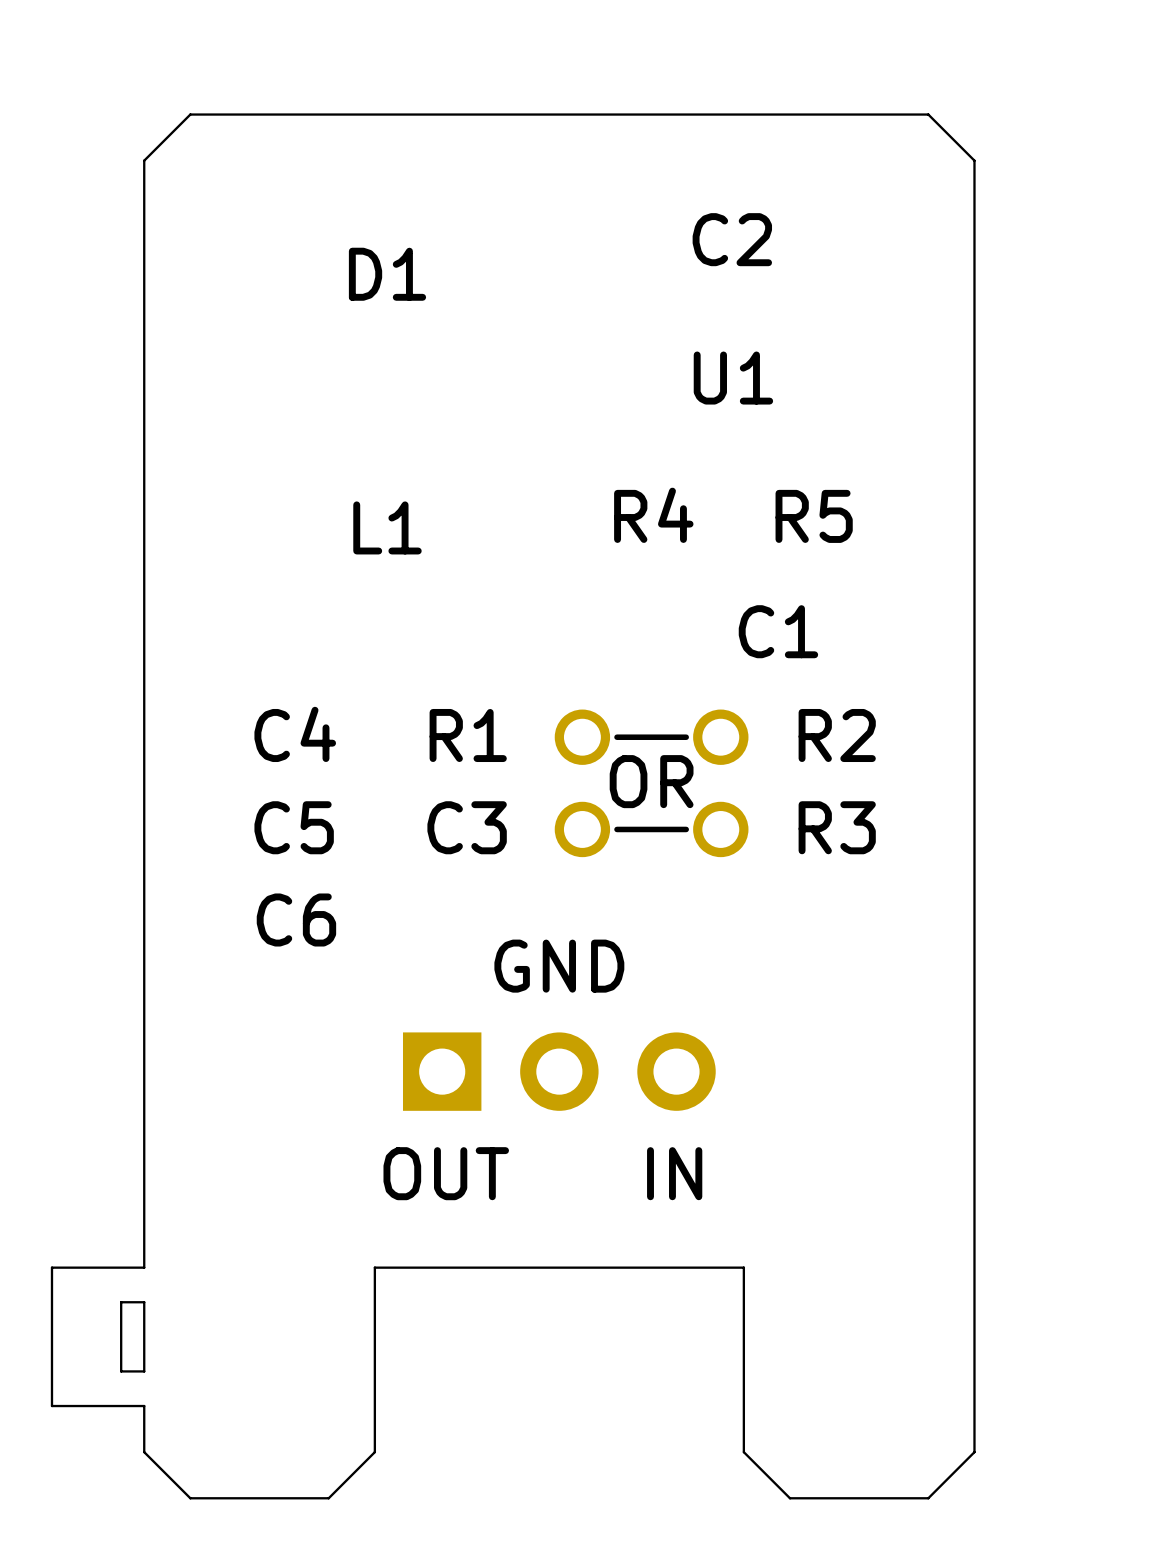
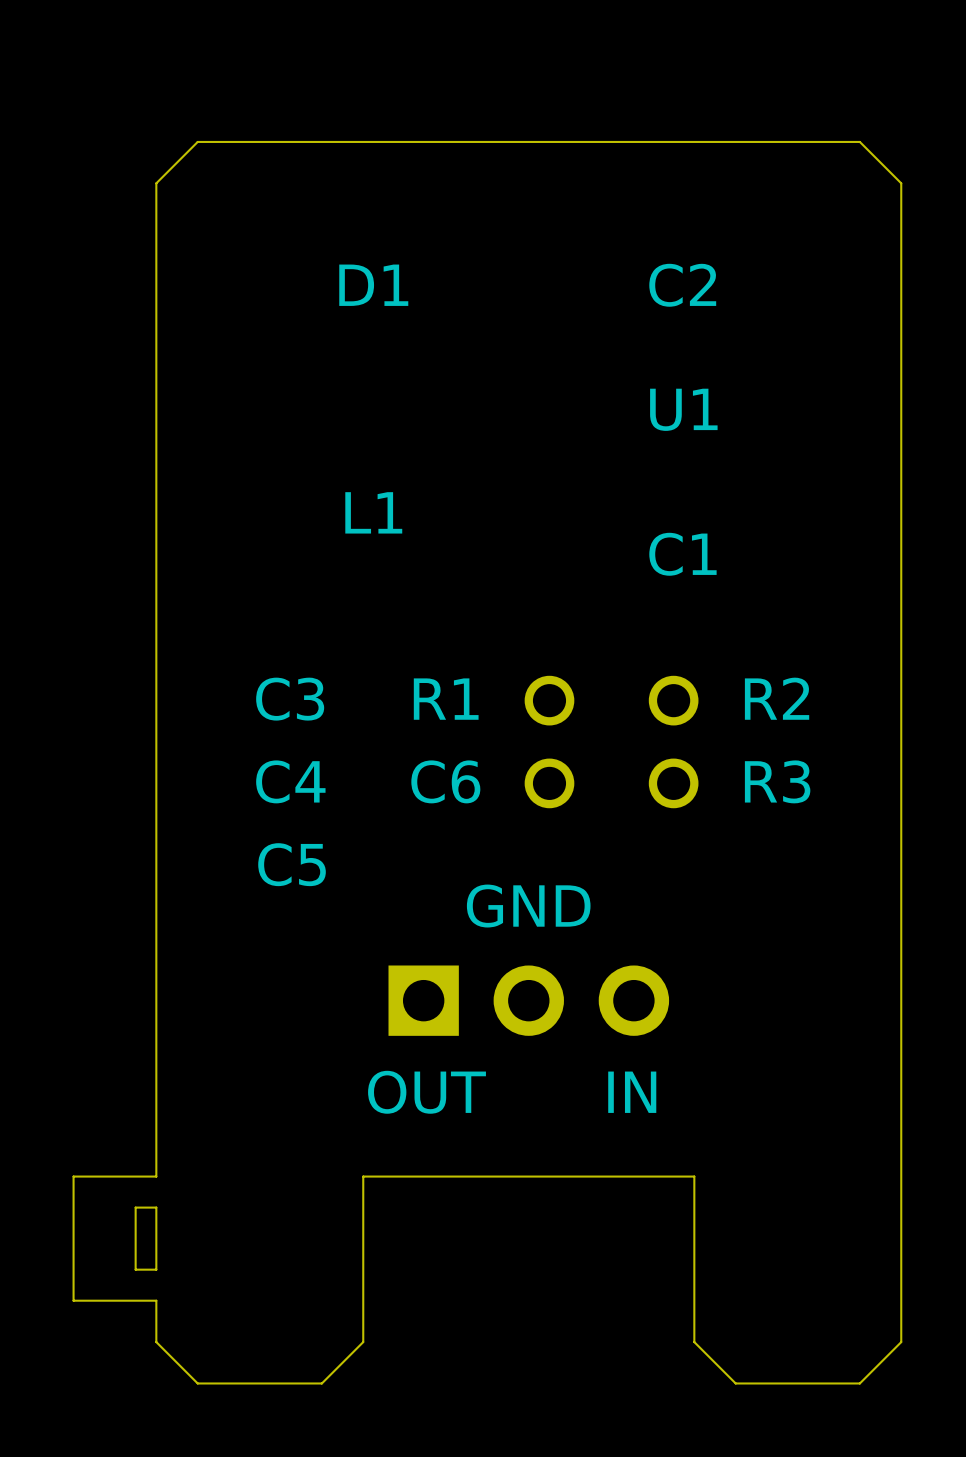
C2 position: (732, 239) -> (682, 285)
U1 position: (733, 378) -> (683, 409)
R4: (653, 515) -> none
R5: (814, 516) -> none
C1 position: (778, 631) -> (682, 554)
C4 name: C4 (295, 734) -> C3 (290, 699)
line: (686, 737) (617, 737) -> none
text: OR (651, 781) -> none
C5 name: C5 (294, 827) -> C4 (290, 781)
C3 name: C3 (467, 827) -> C6 (445, 781)
line: (686, 829) (617, 829) -> none
C6 name: C6 (296, 919) -> C5 (292, 864)

